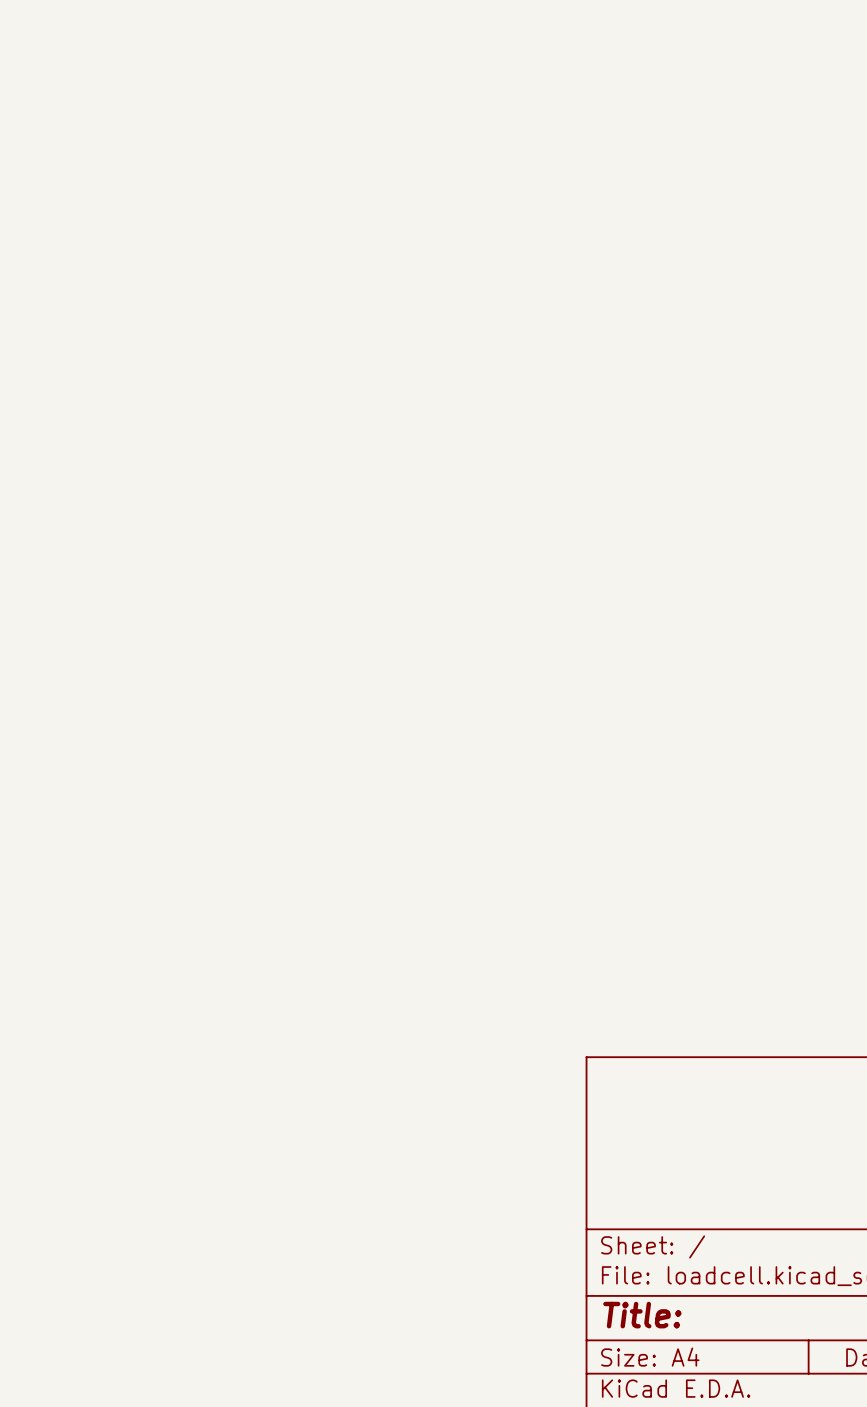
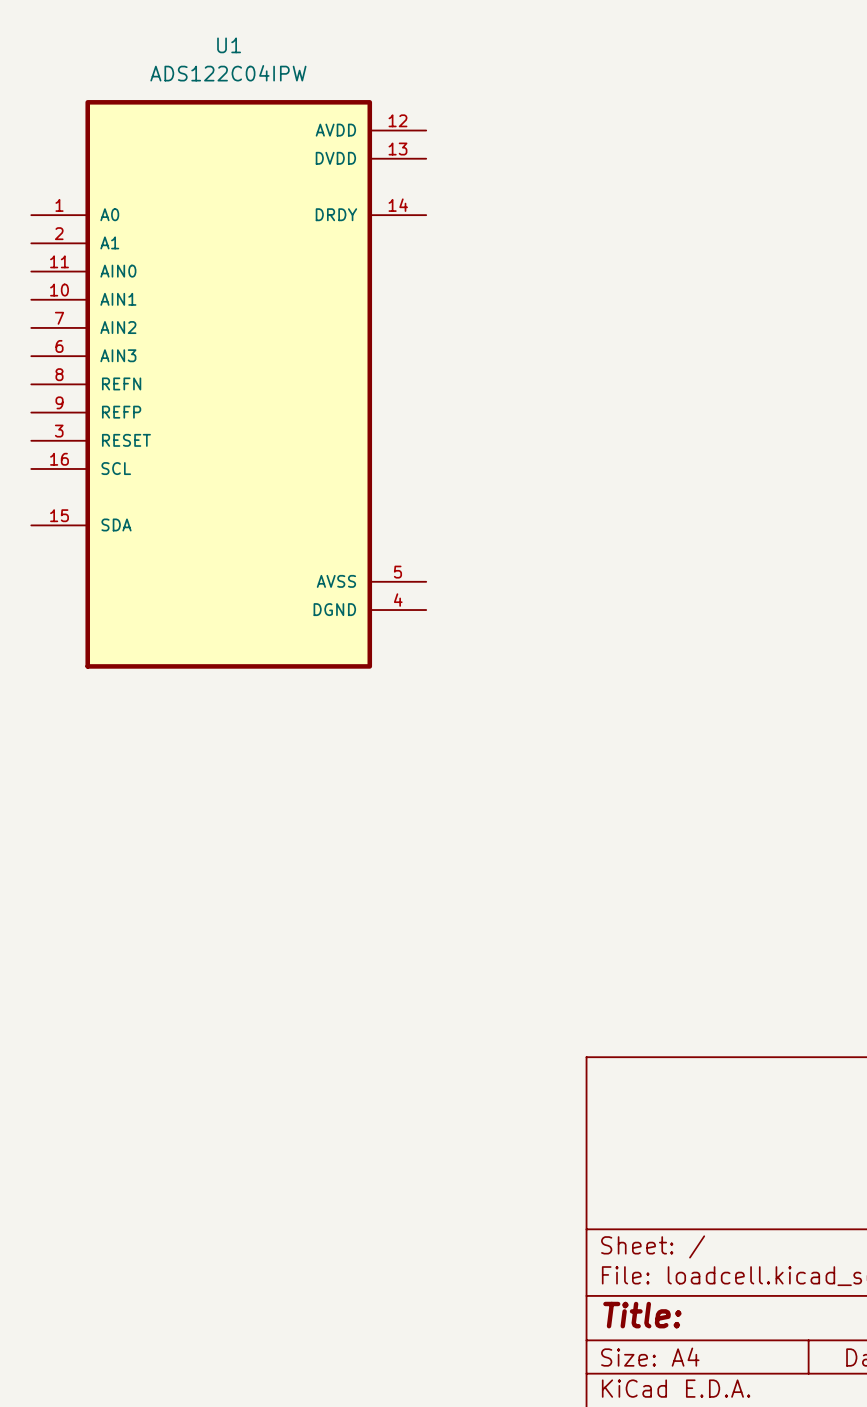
U1: none -> ADS122C04IPW (228, 384)

